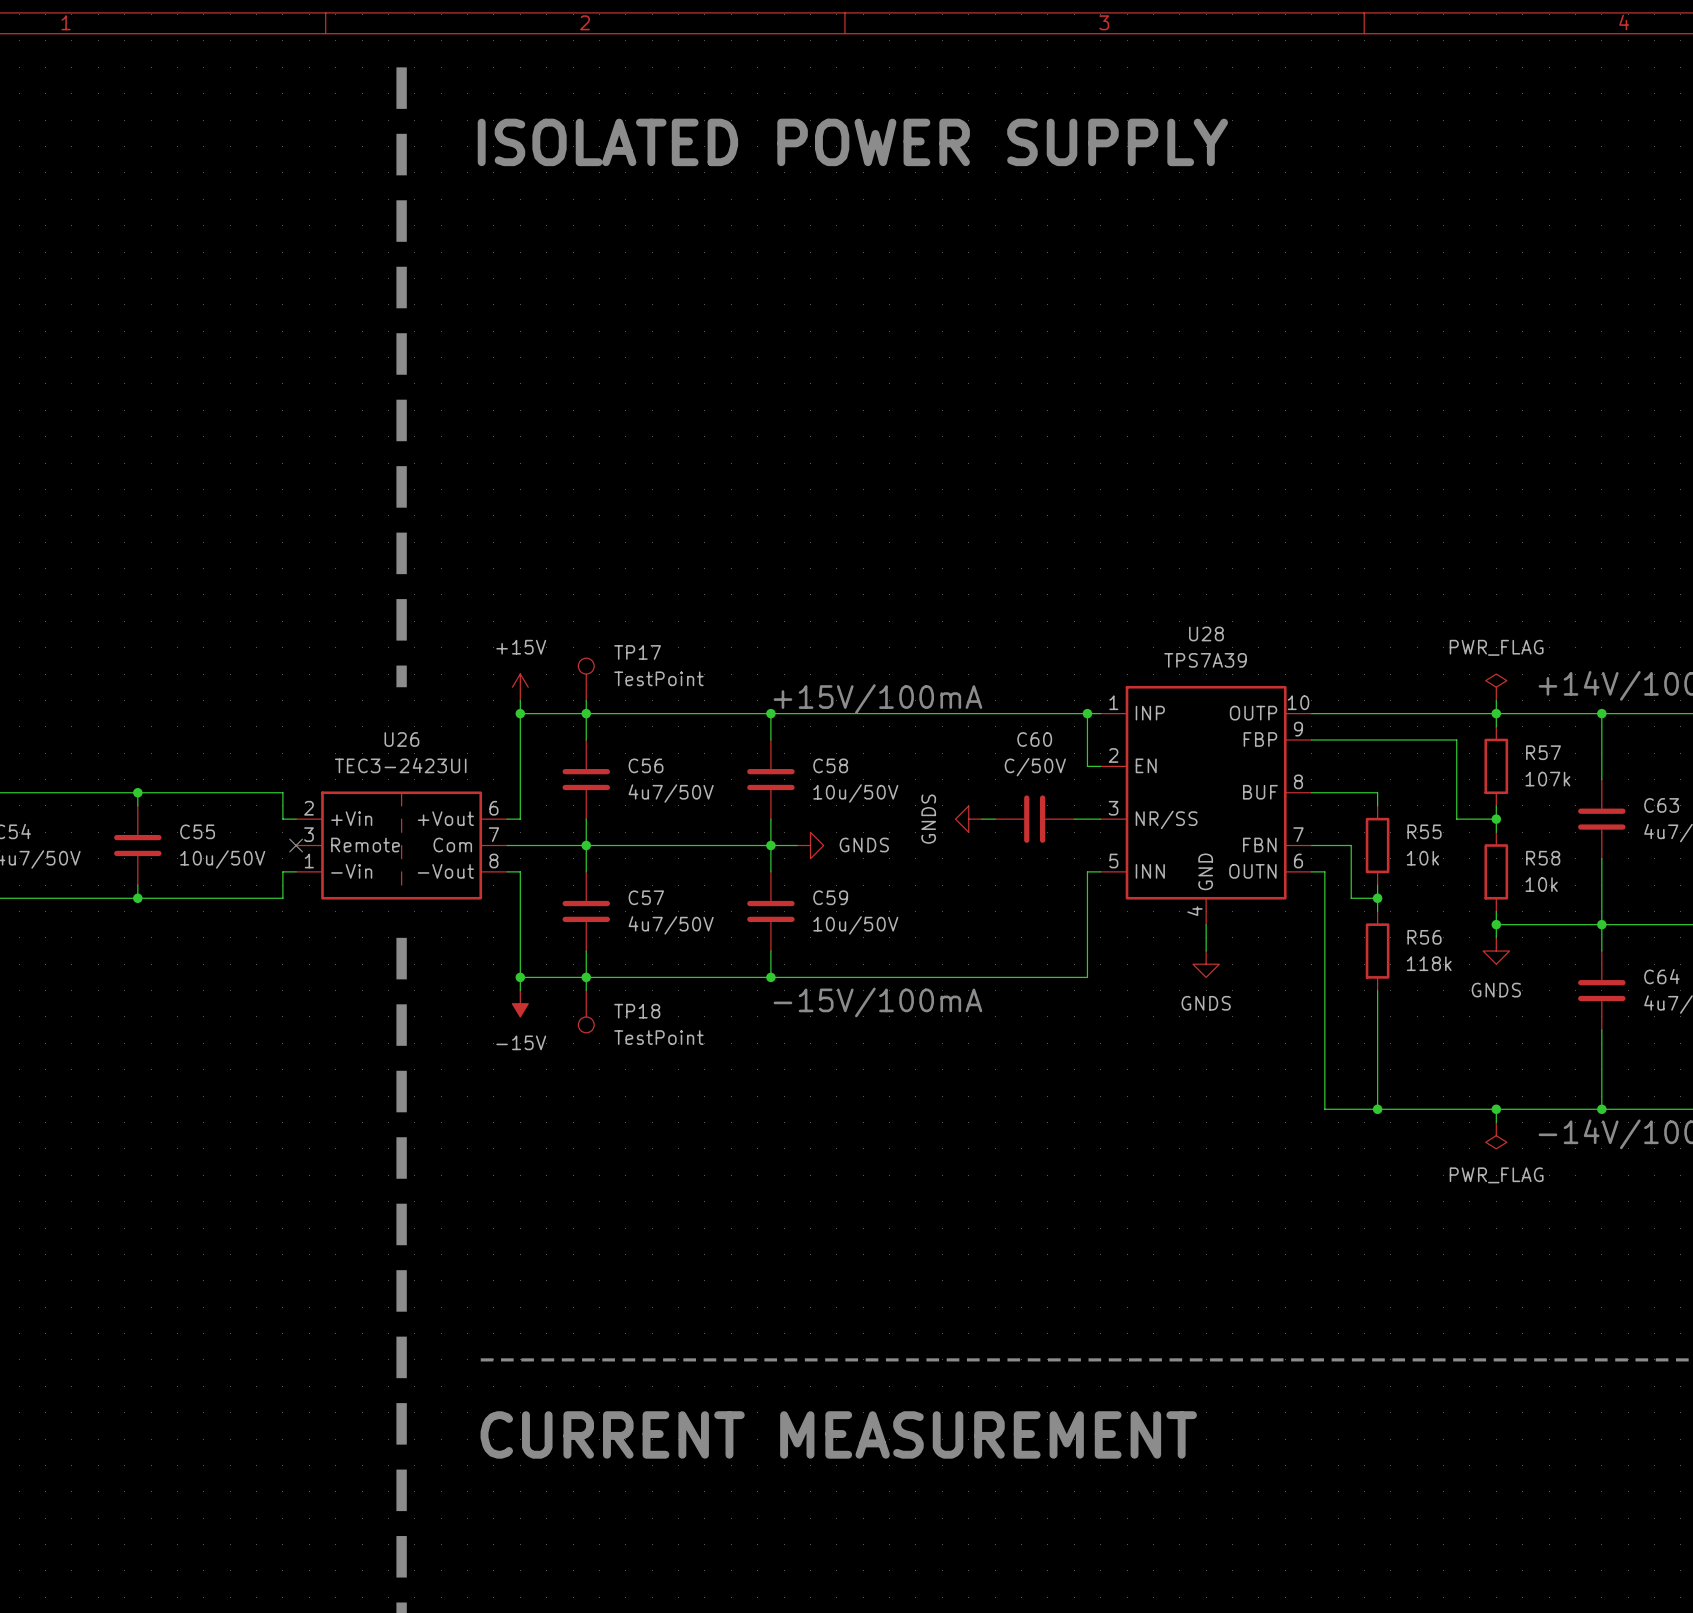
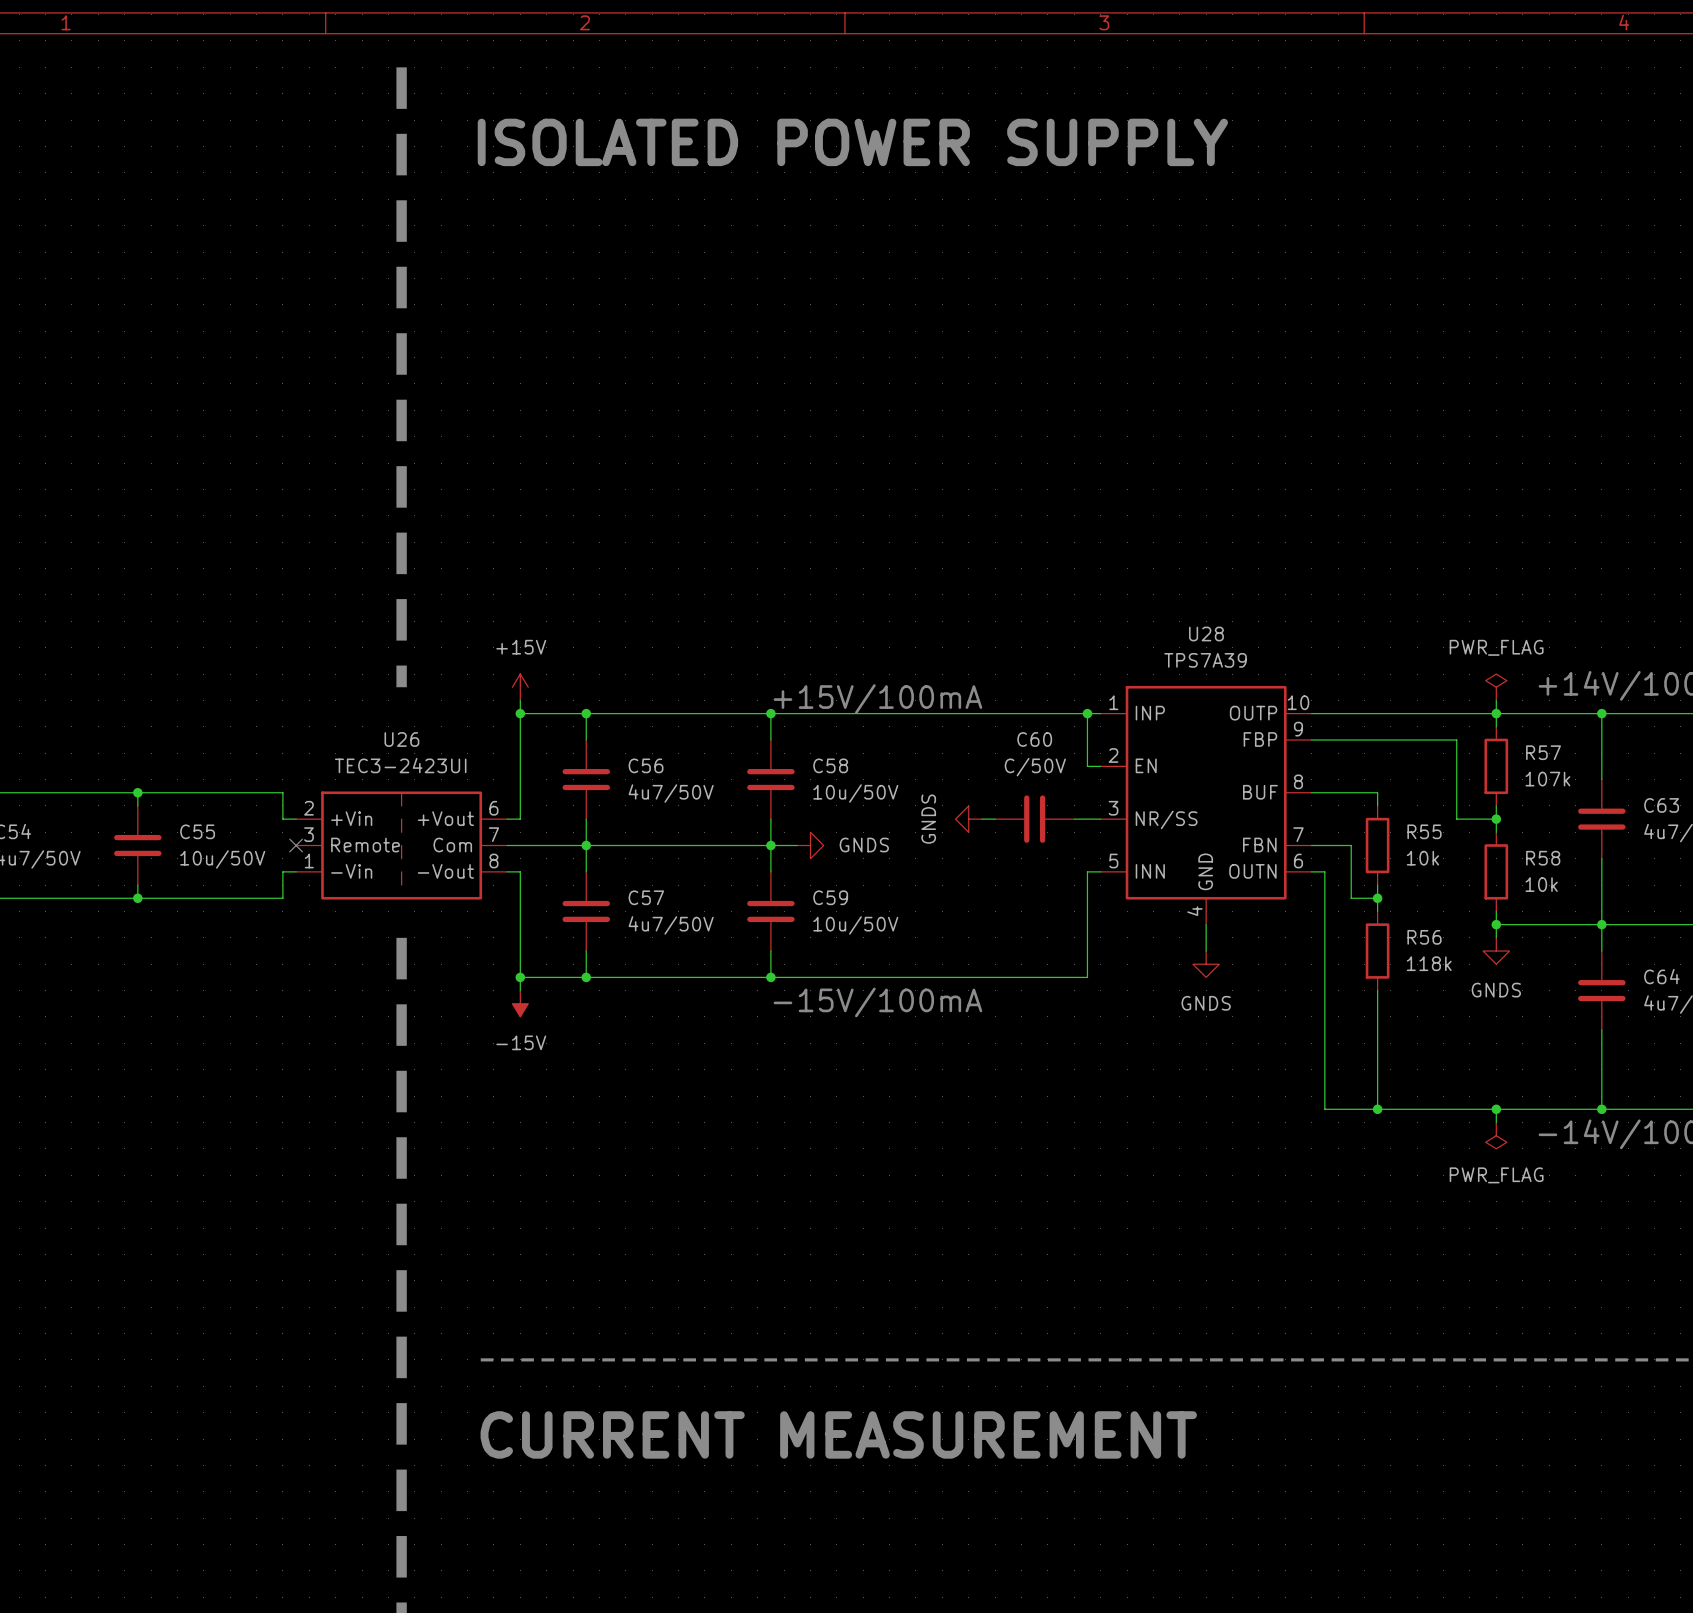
TP17: TestPoint (586, 679) -> none
wire: (586, 700) (586, 713) -> none
wire: (586, 977) (586, 990) -> none
TP18: TestPoint (586, 1011) -> none

